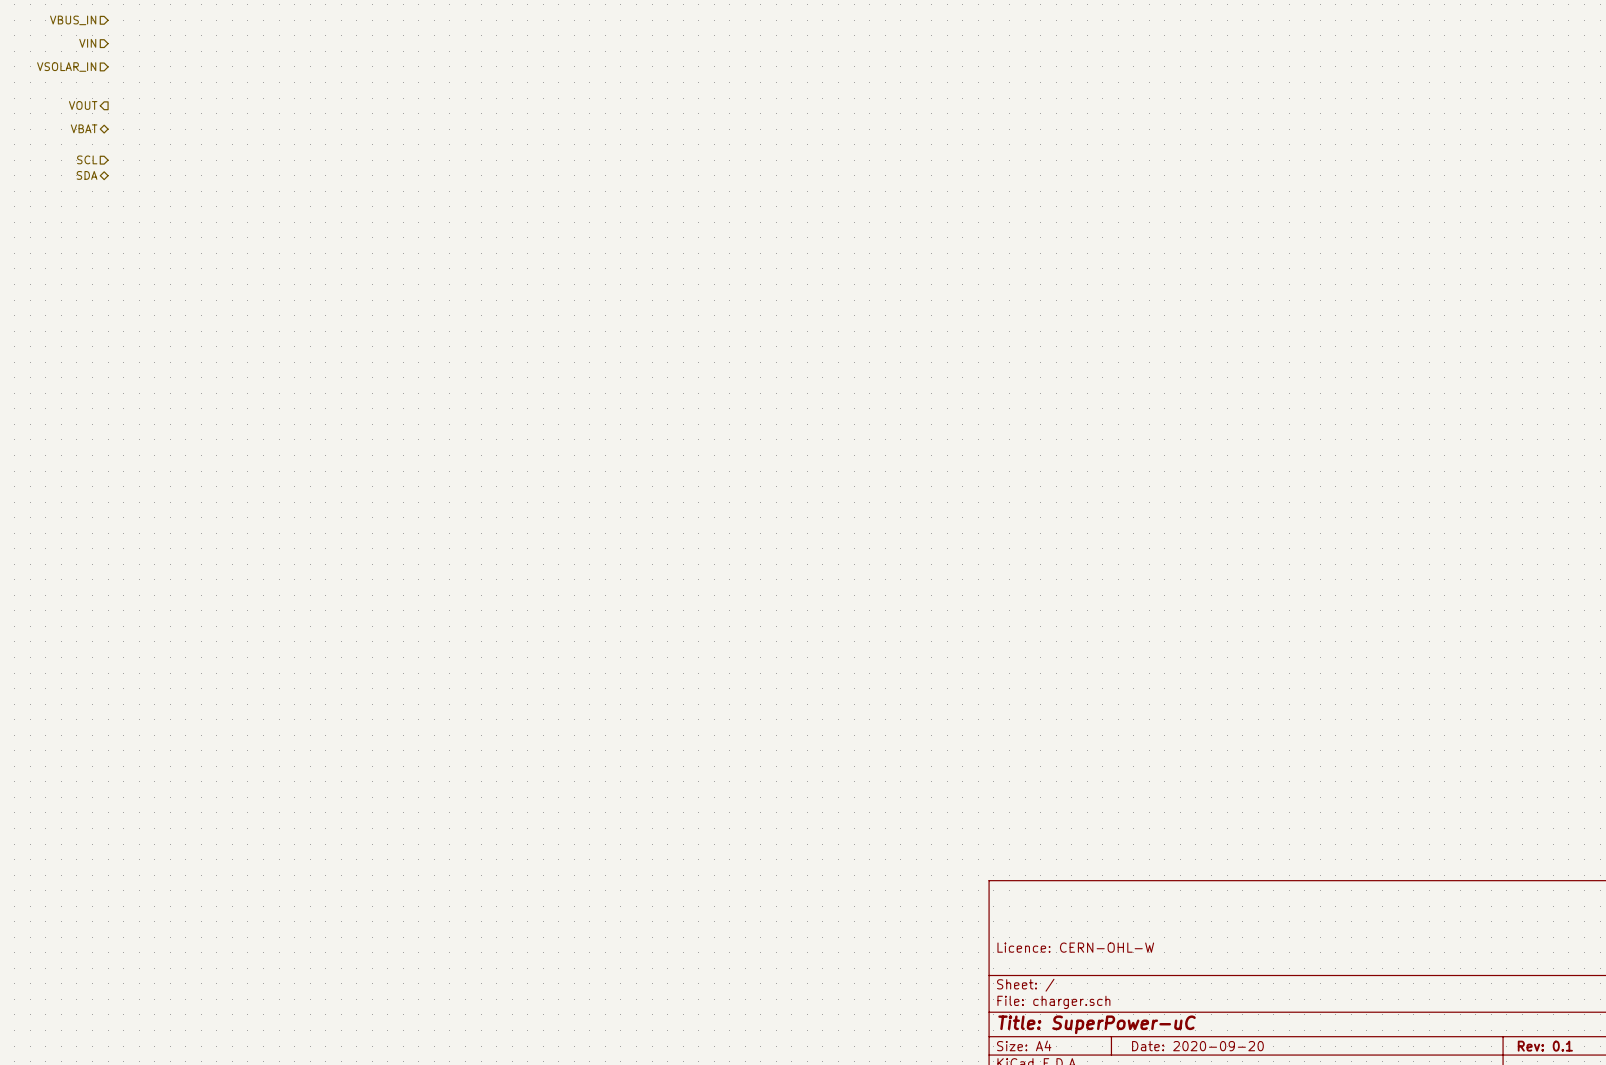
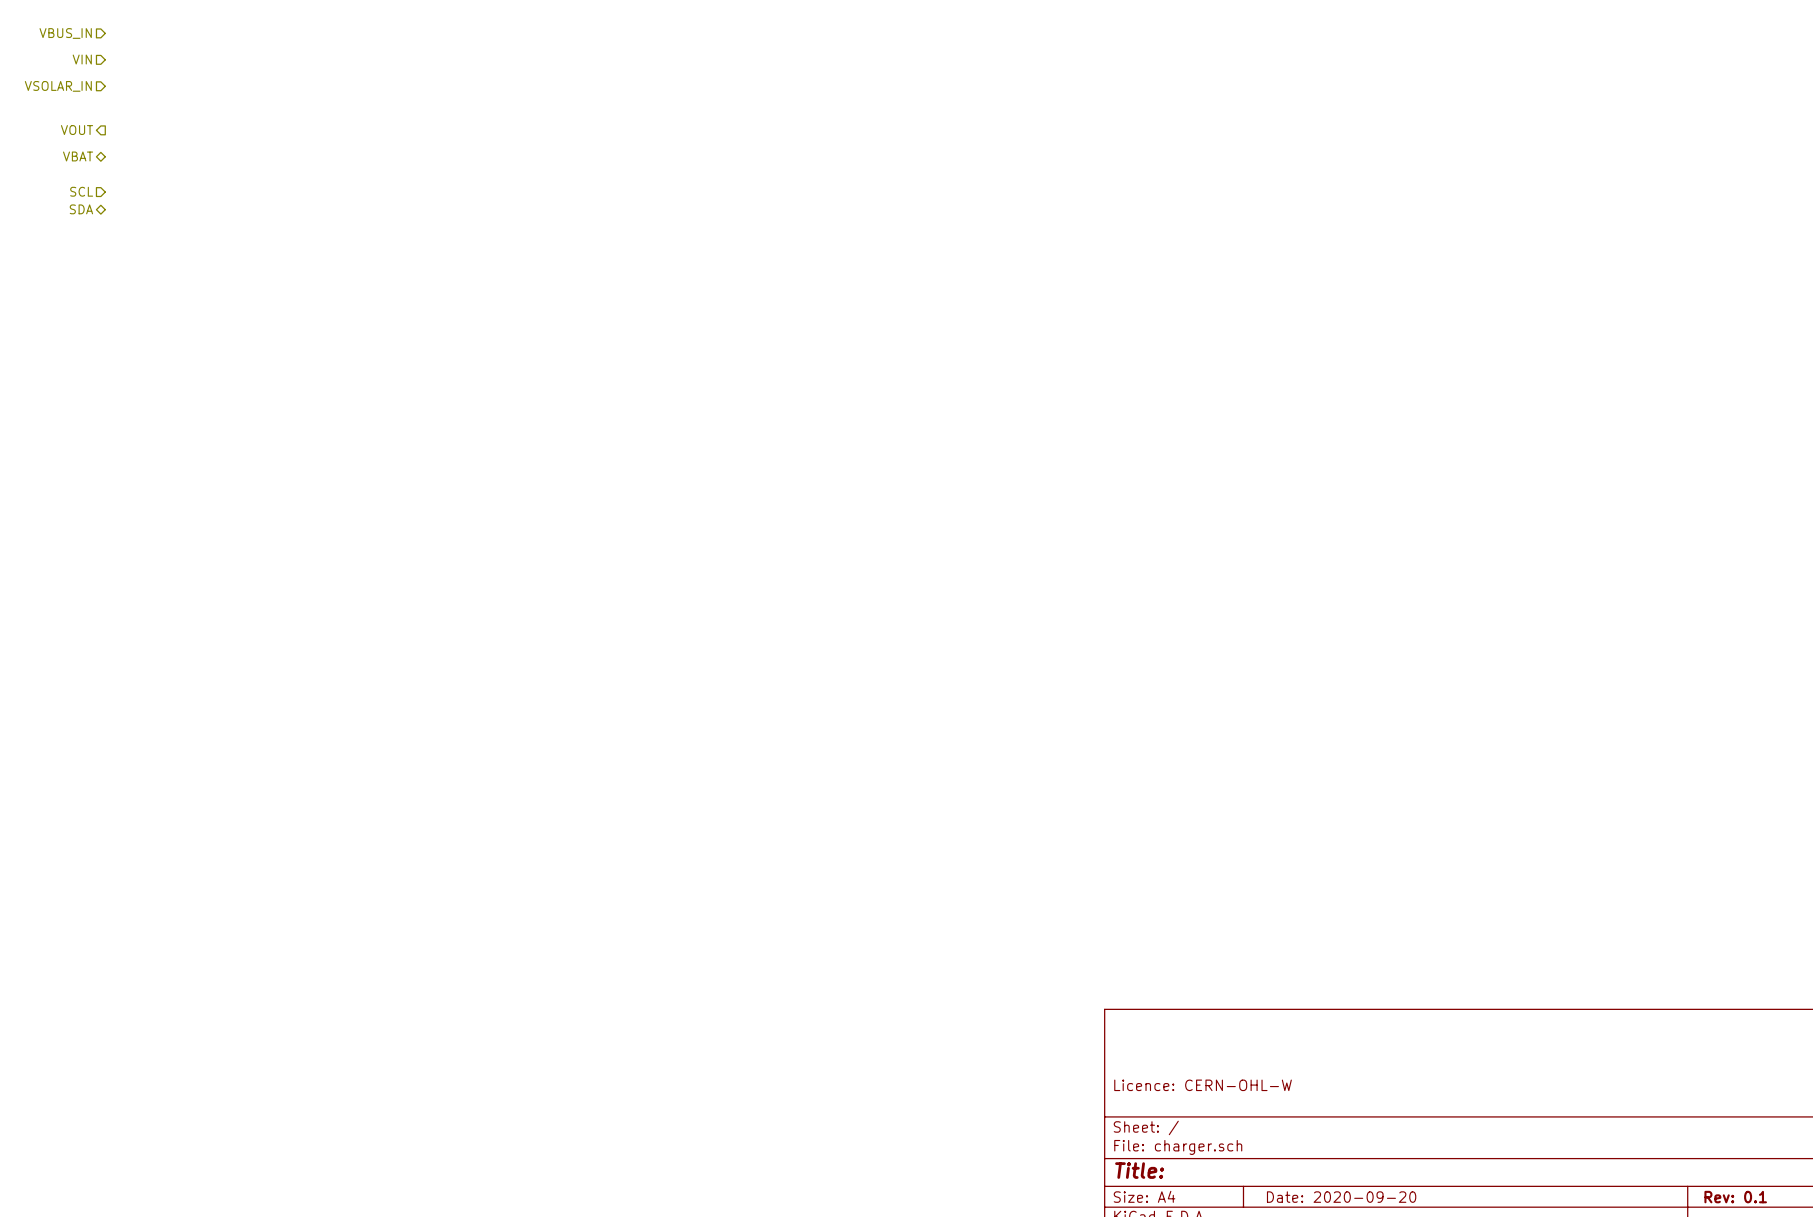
title block: Title: SuperPower-uC (1097, 1024) -> Title: (1139, 1170)

